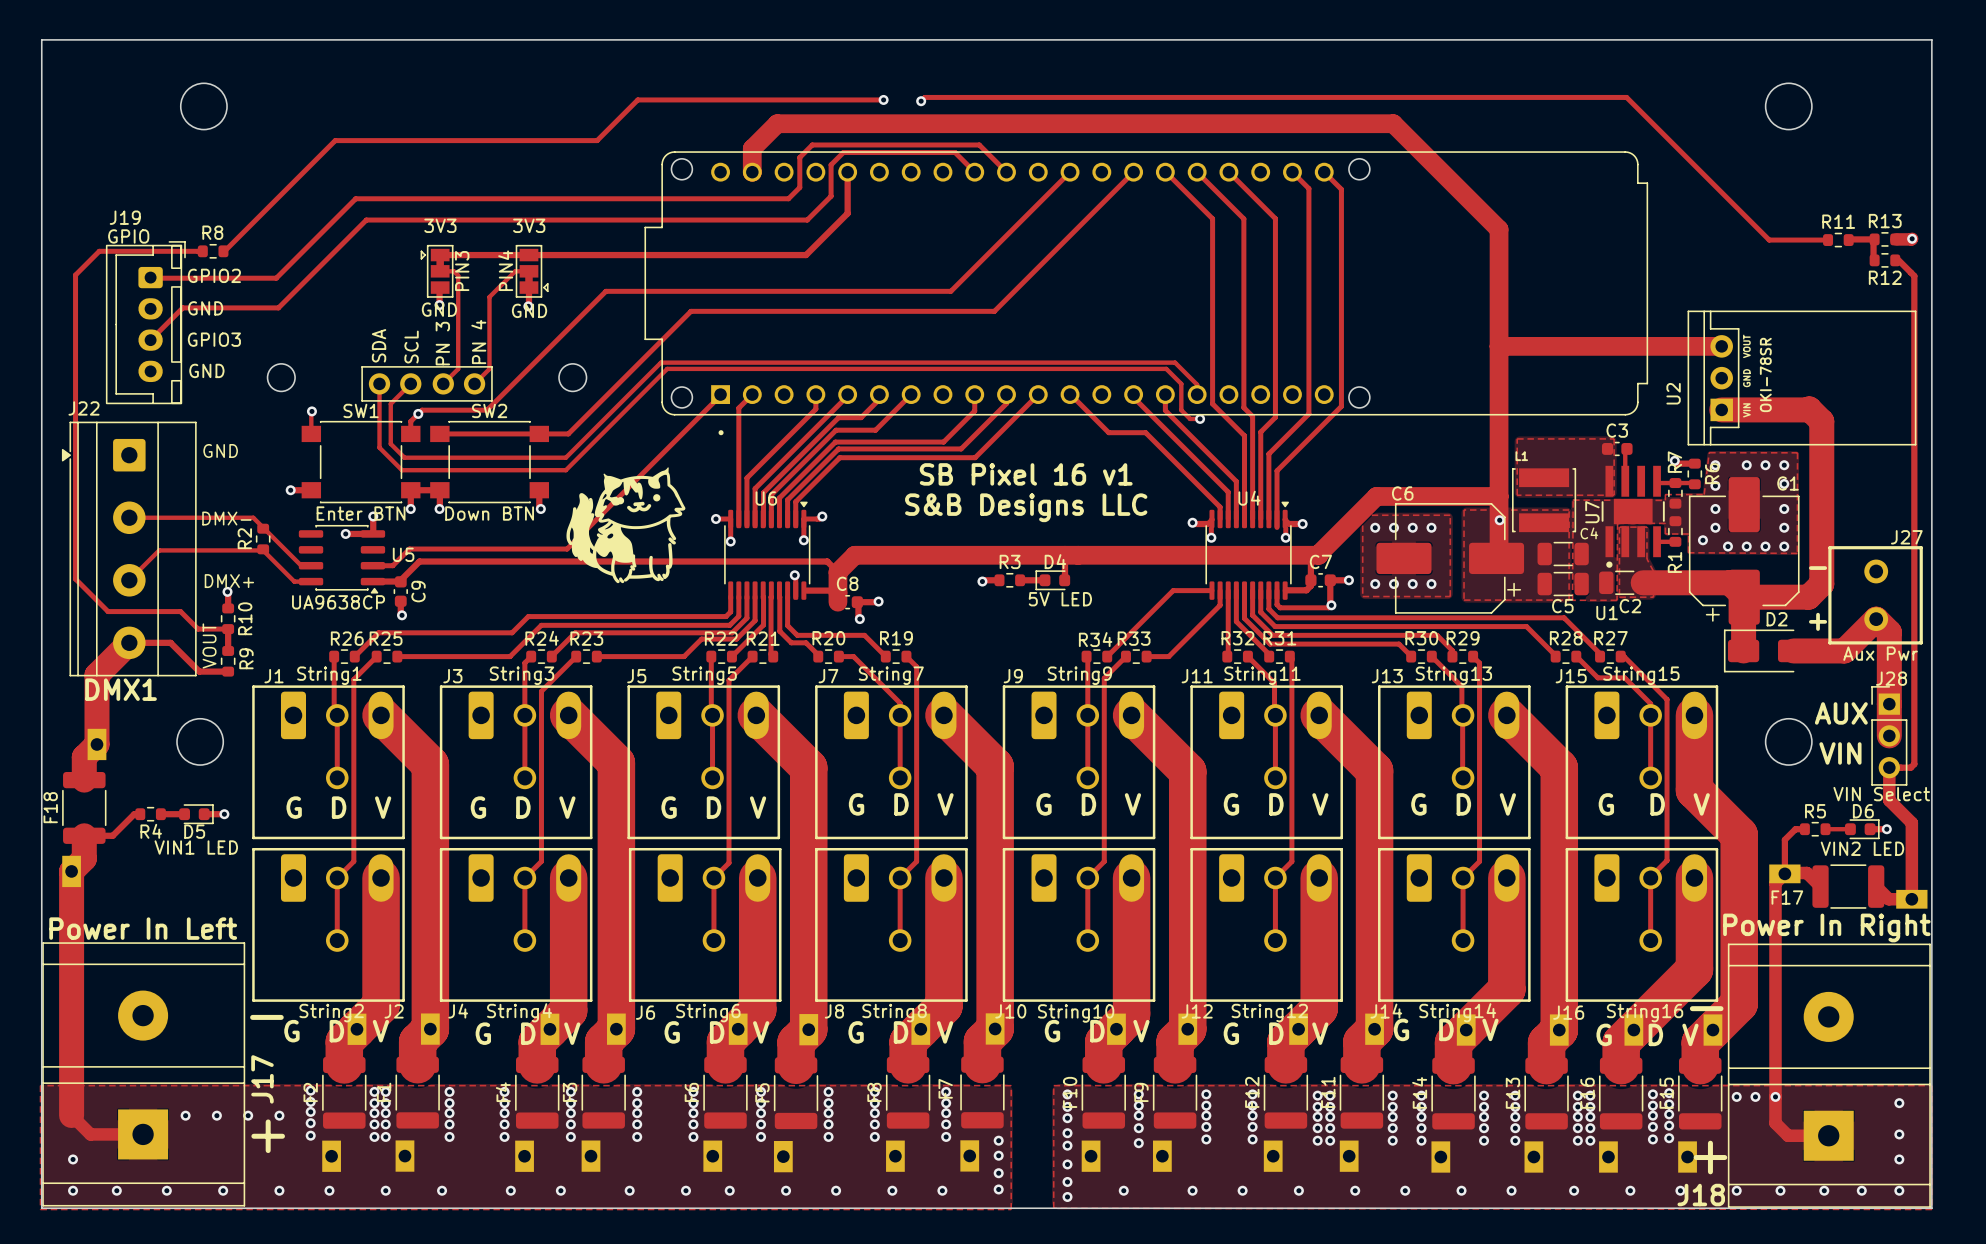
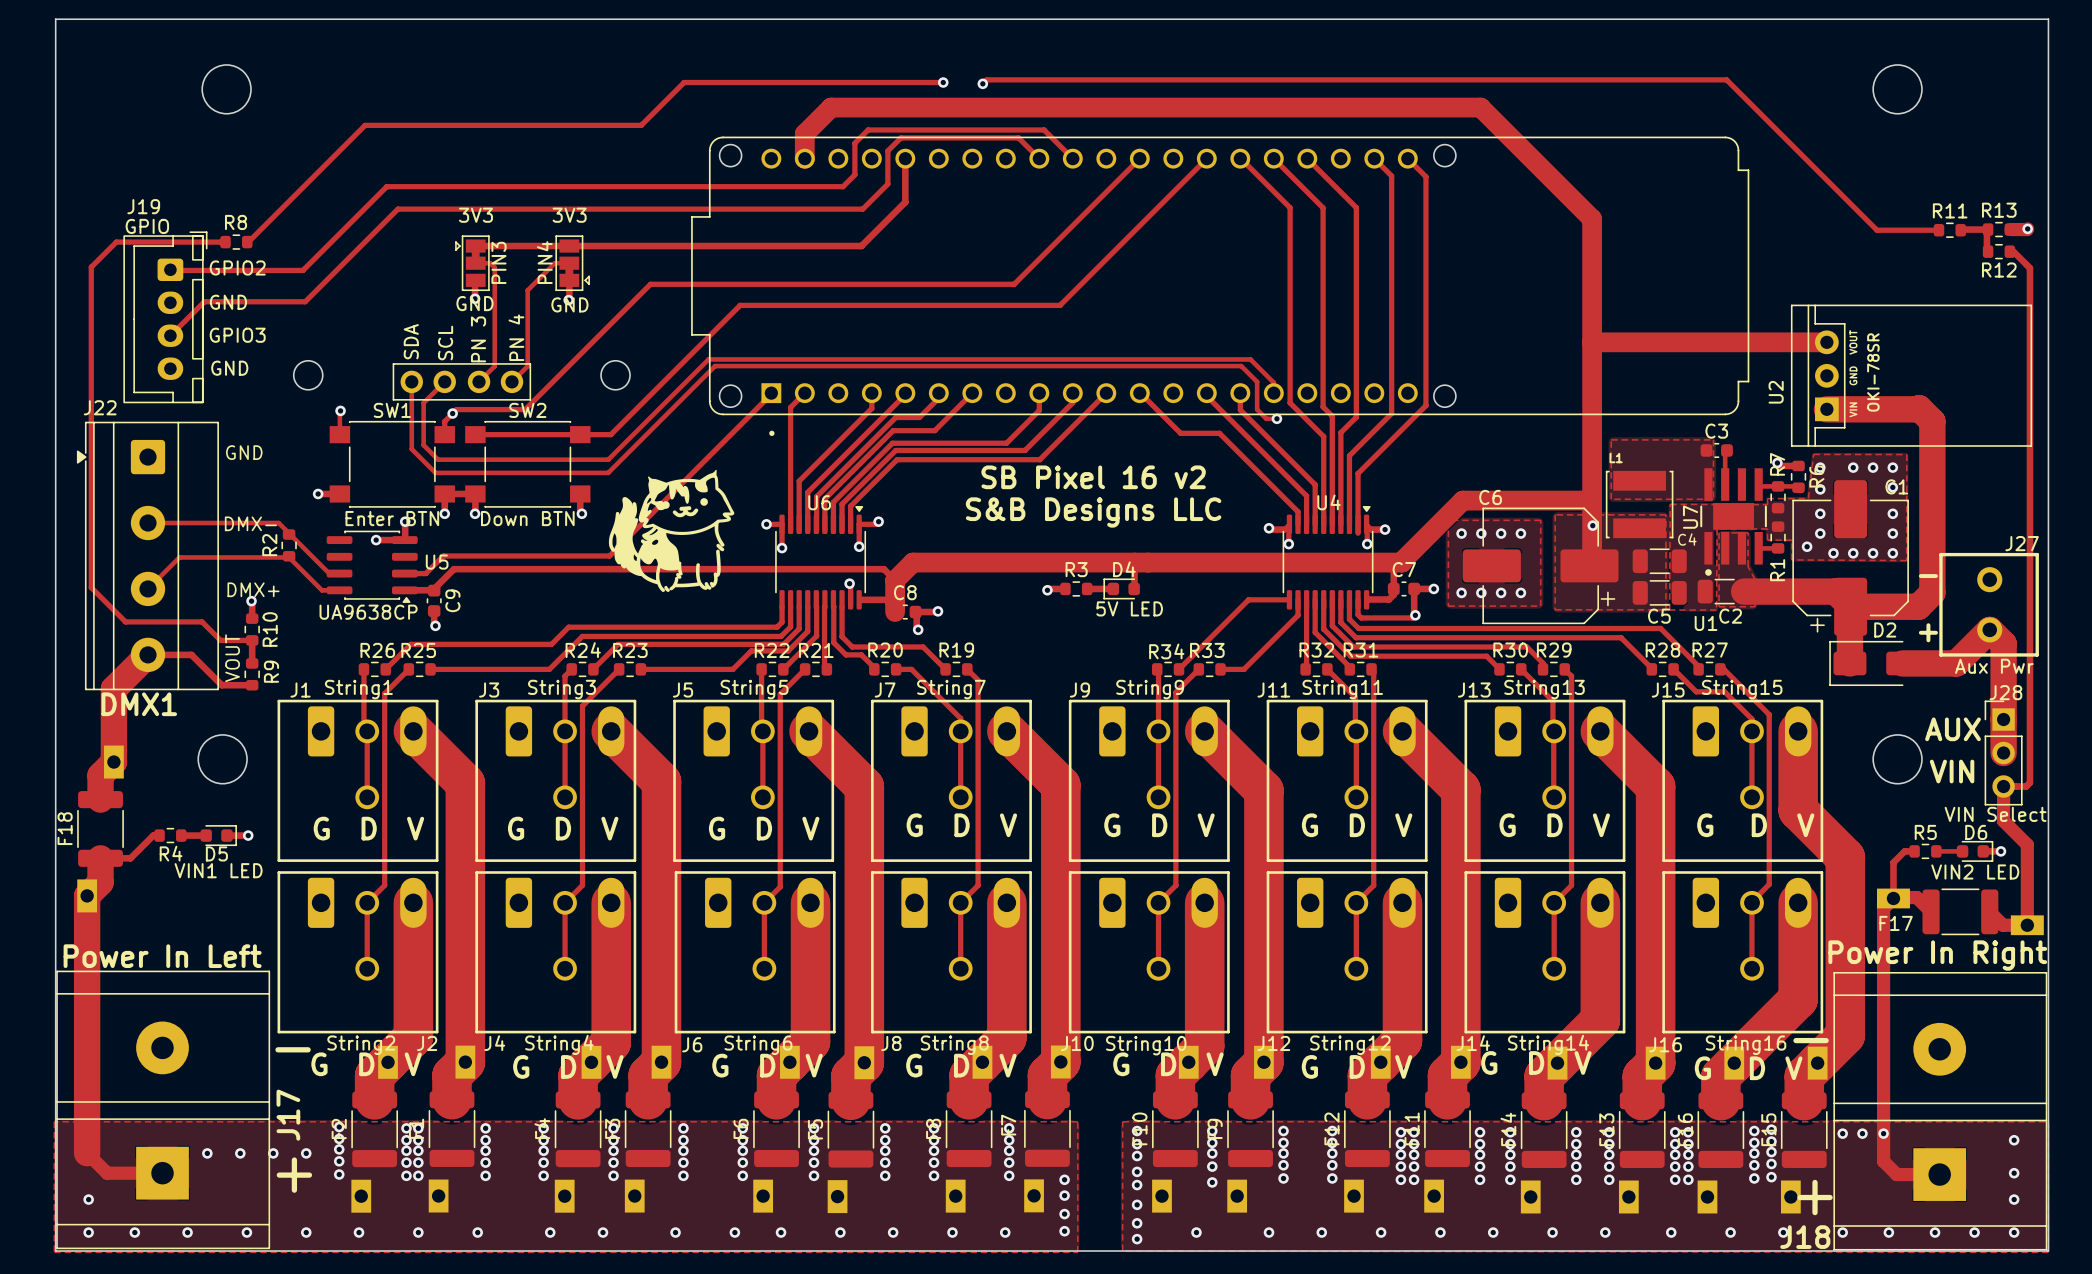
text: SB Pixel 16 v1 (1026, 474) -> SB Pixel 16 v2 (1093, 477)

